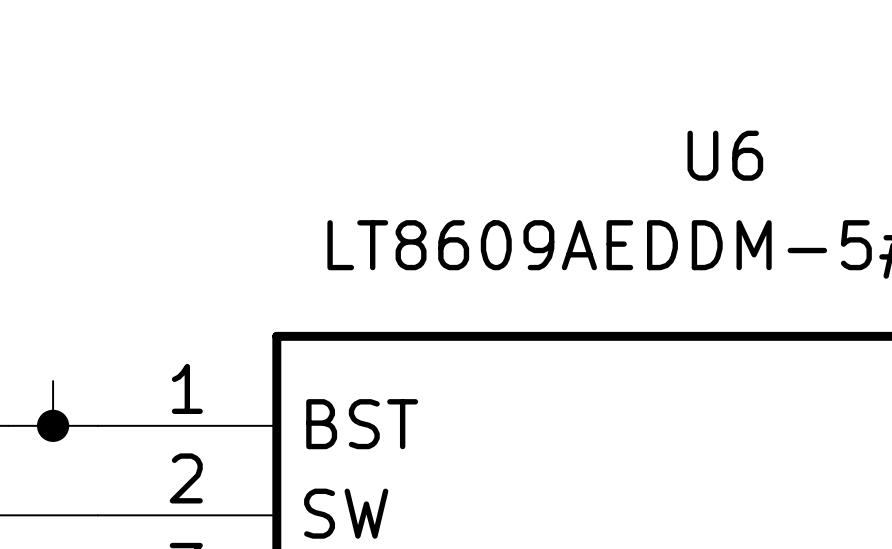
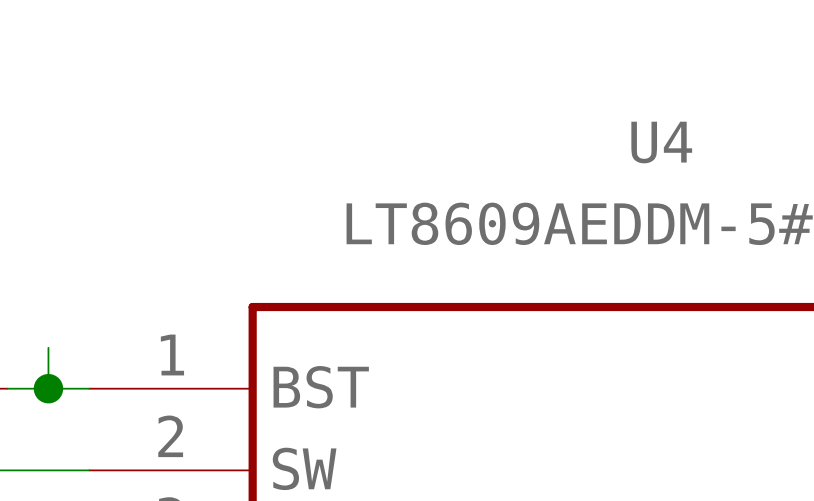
U6 name: U6 (725, 155) -> U4 (661, 142)

